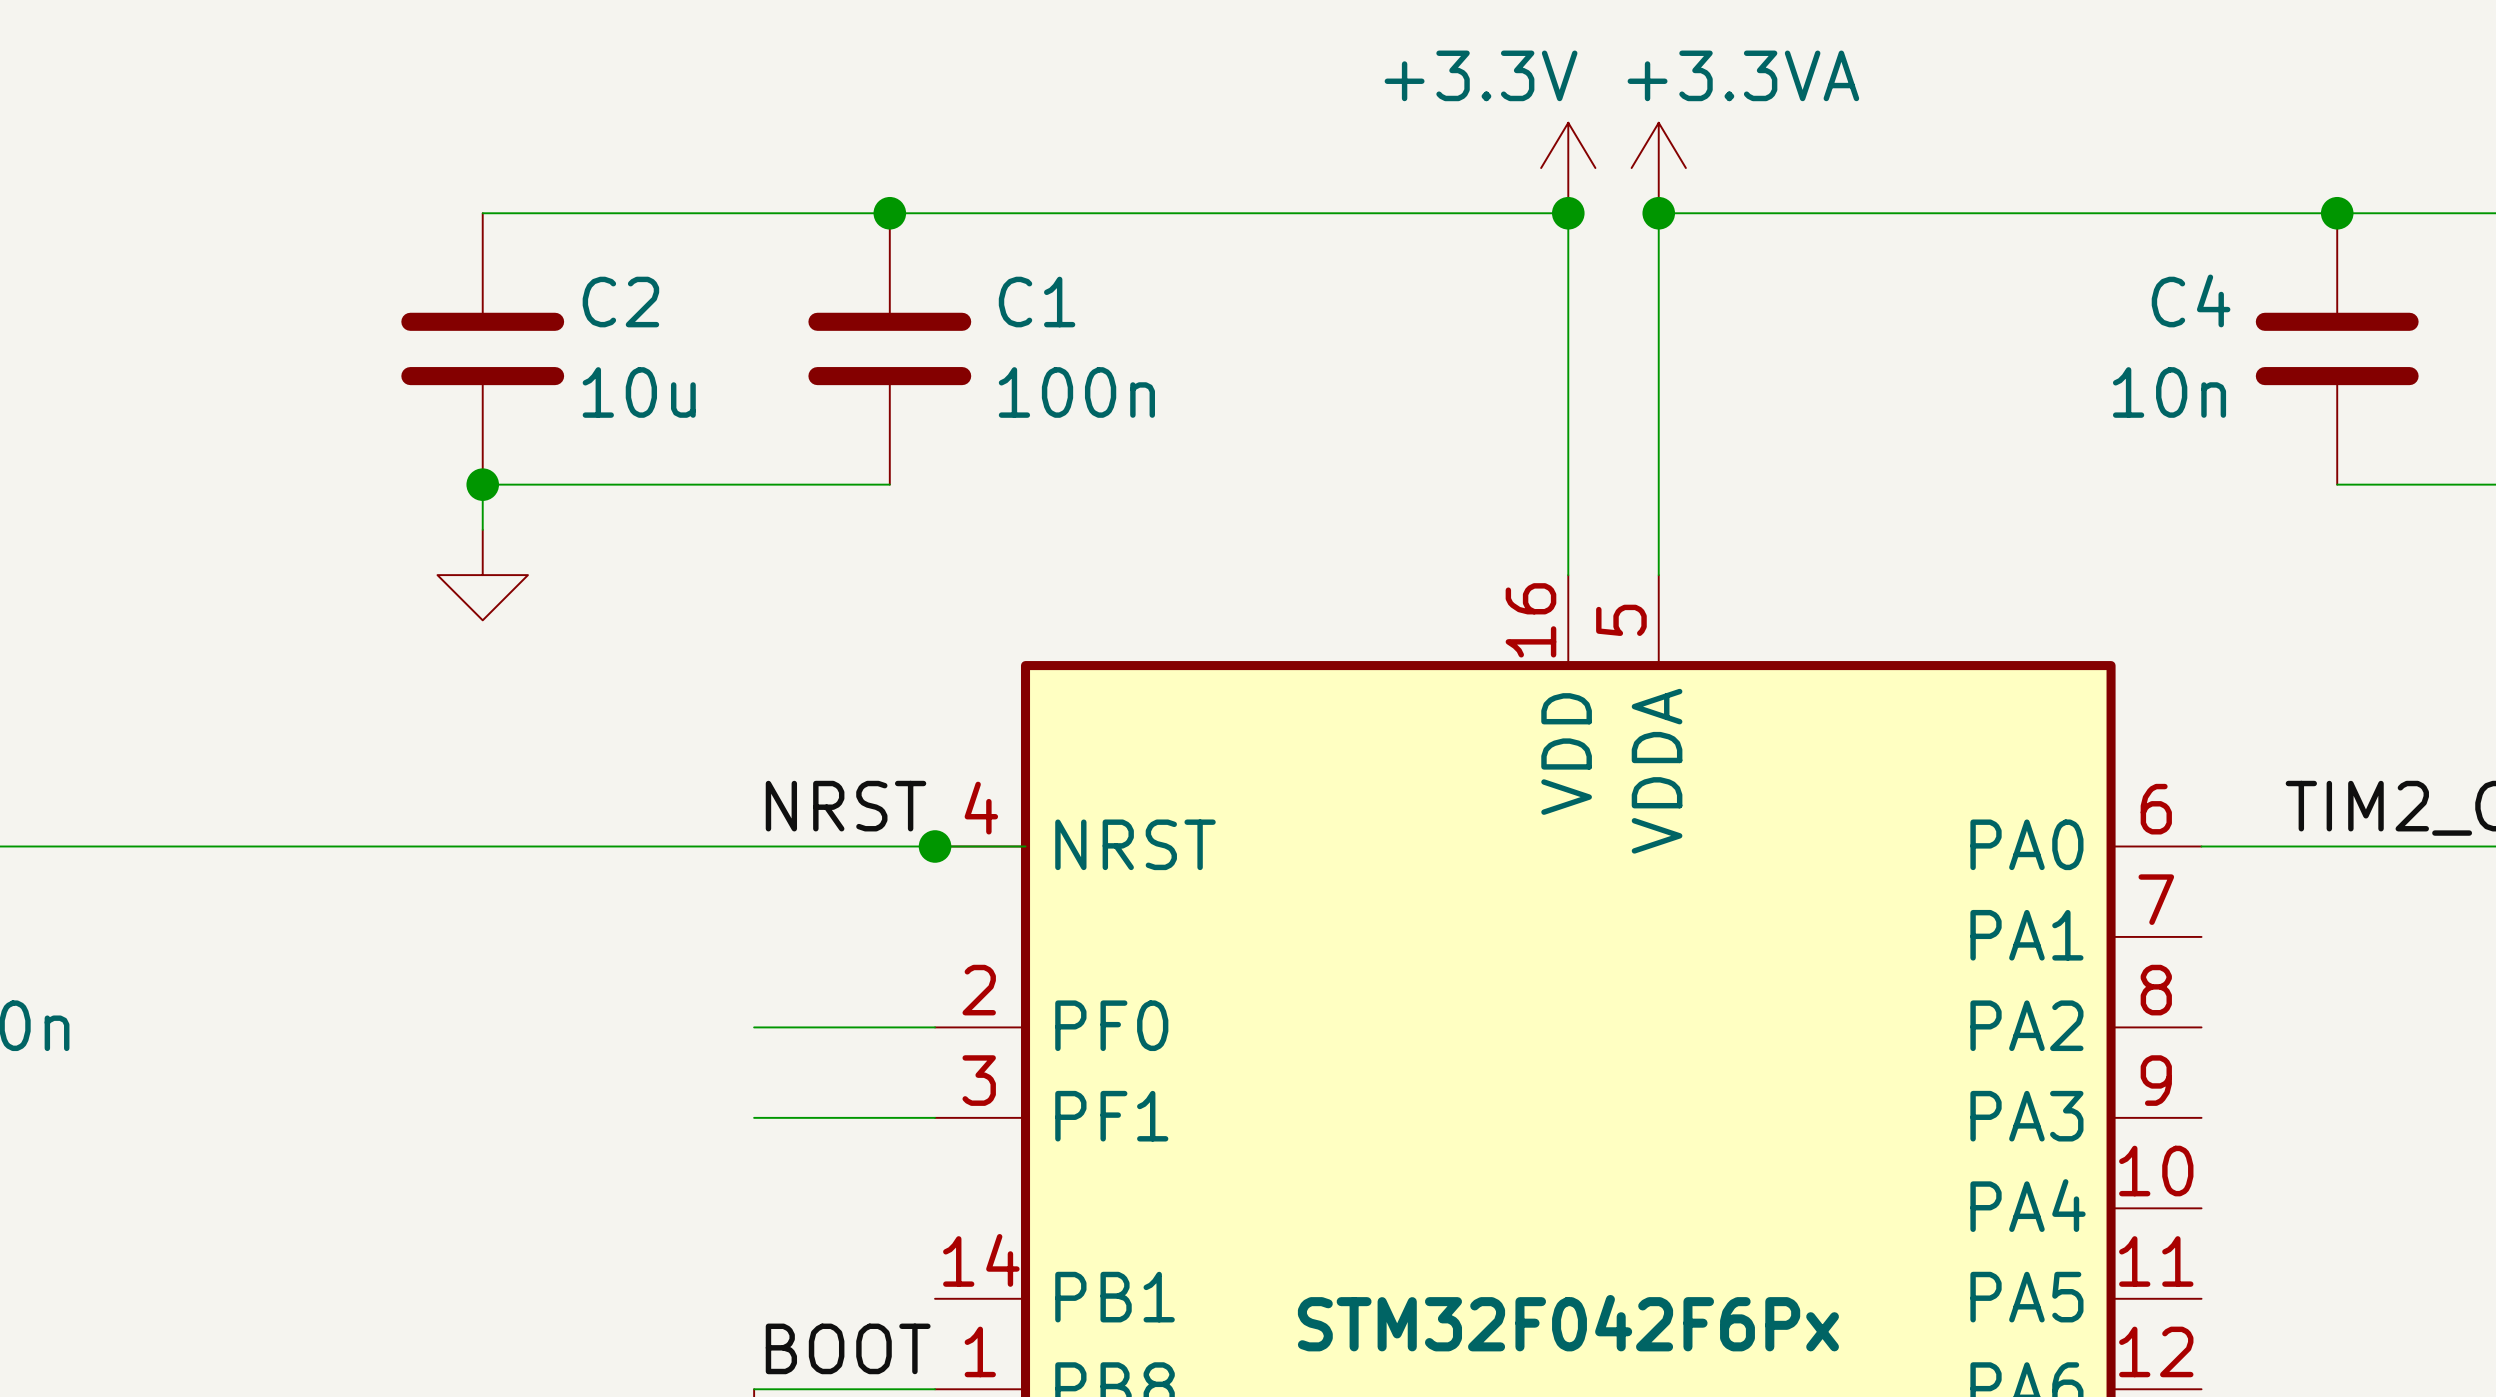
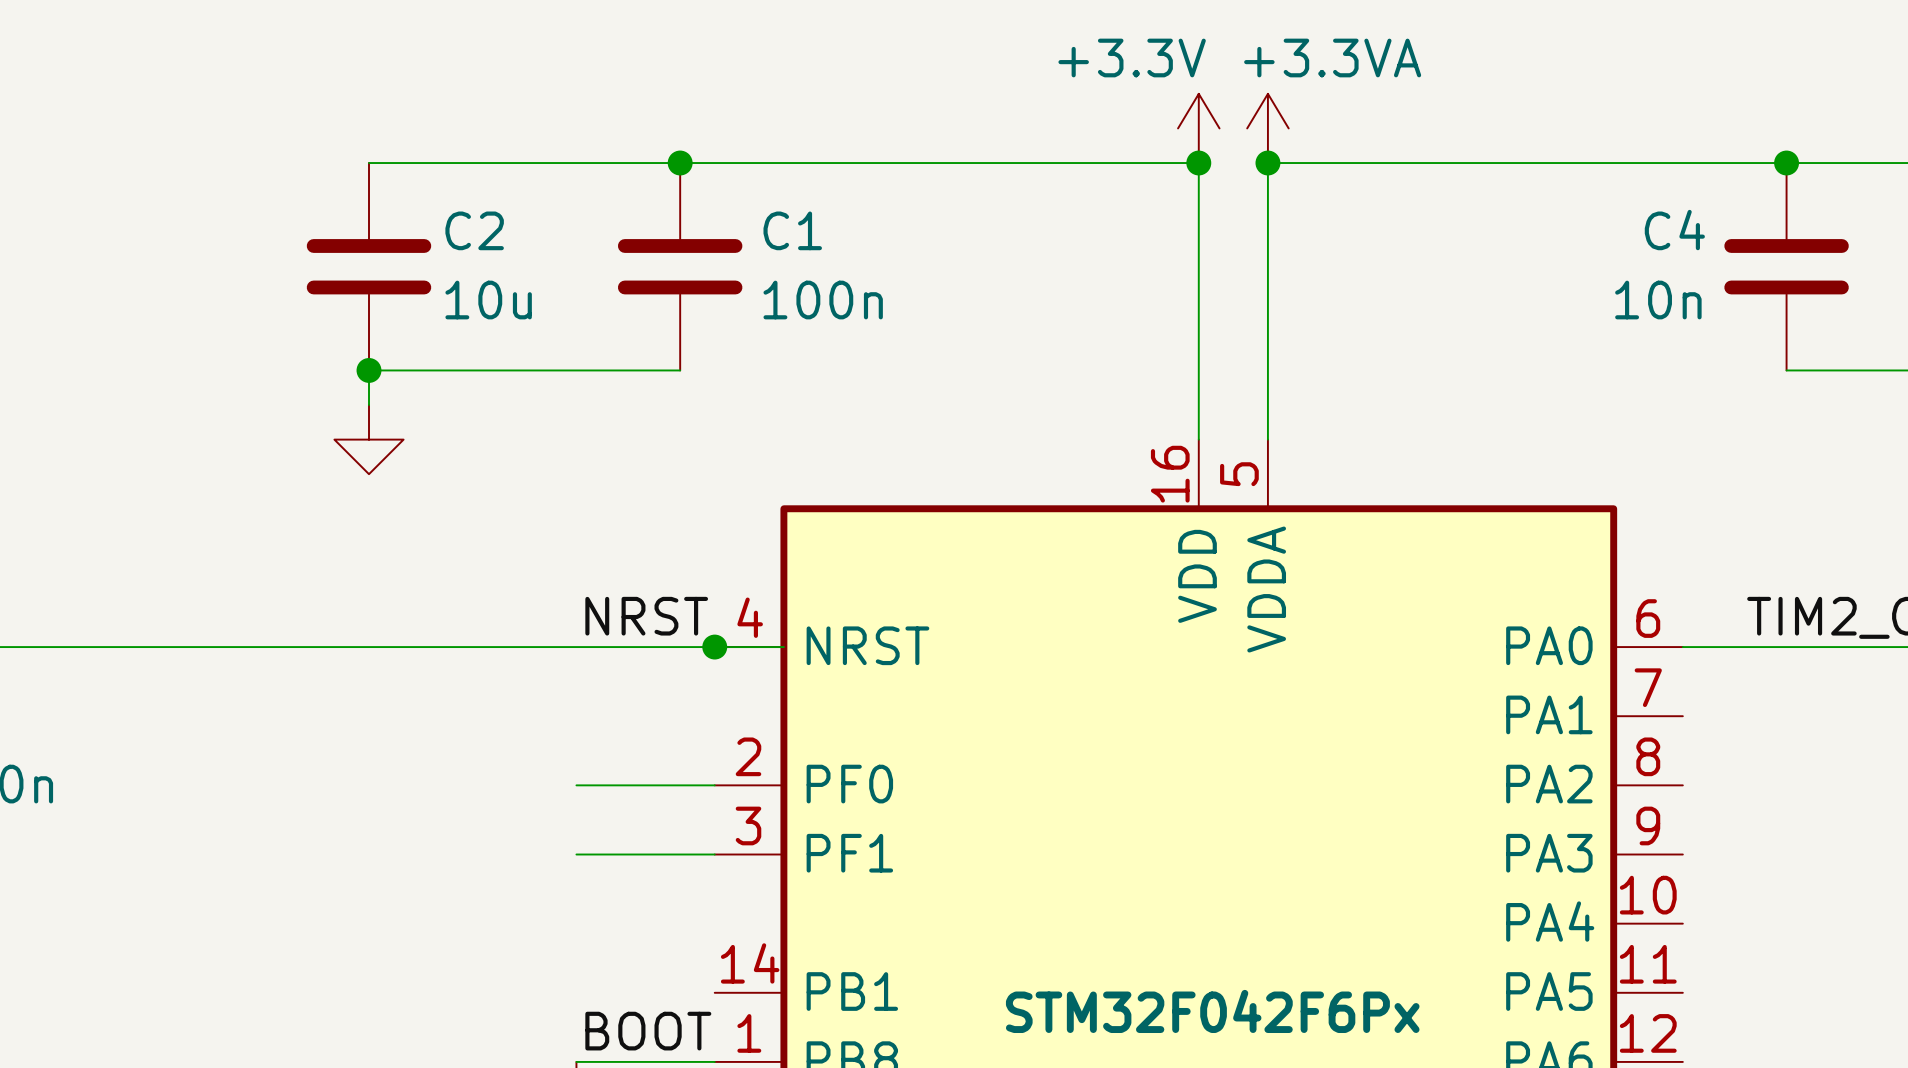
part value position: STM32F042F6Px (1568, 1323) -> STM32F042F6Px (1212, 1011)

